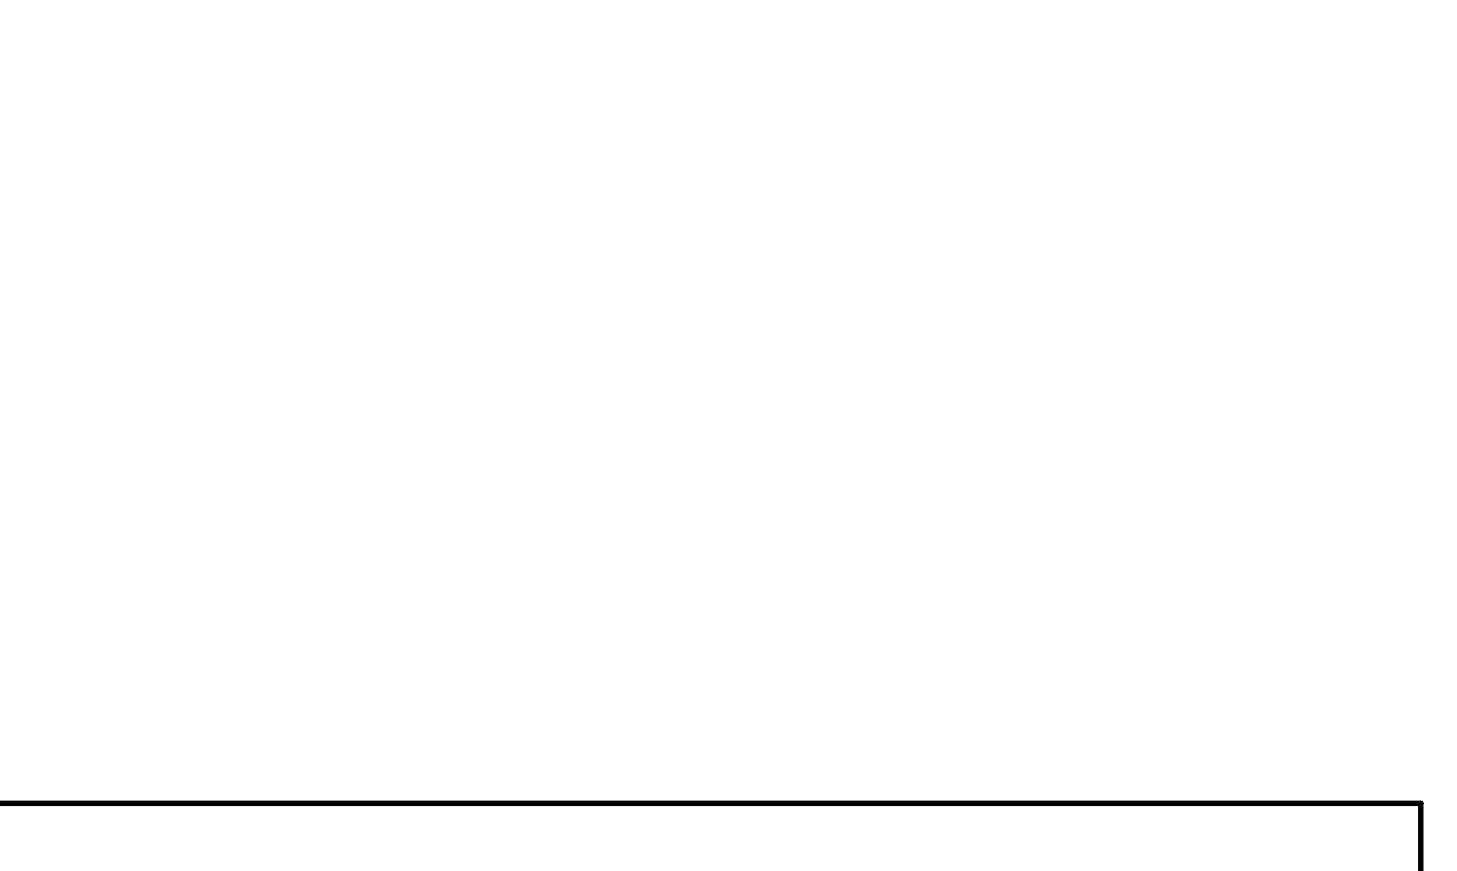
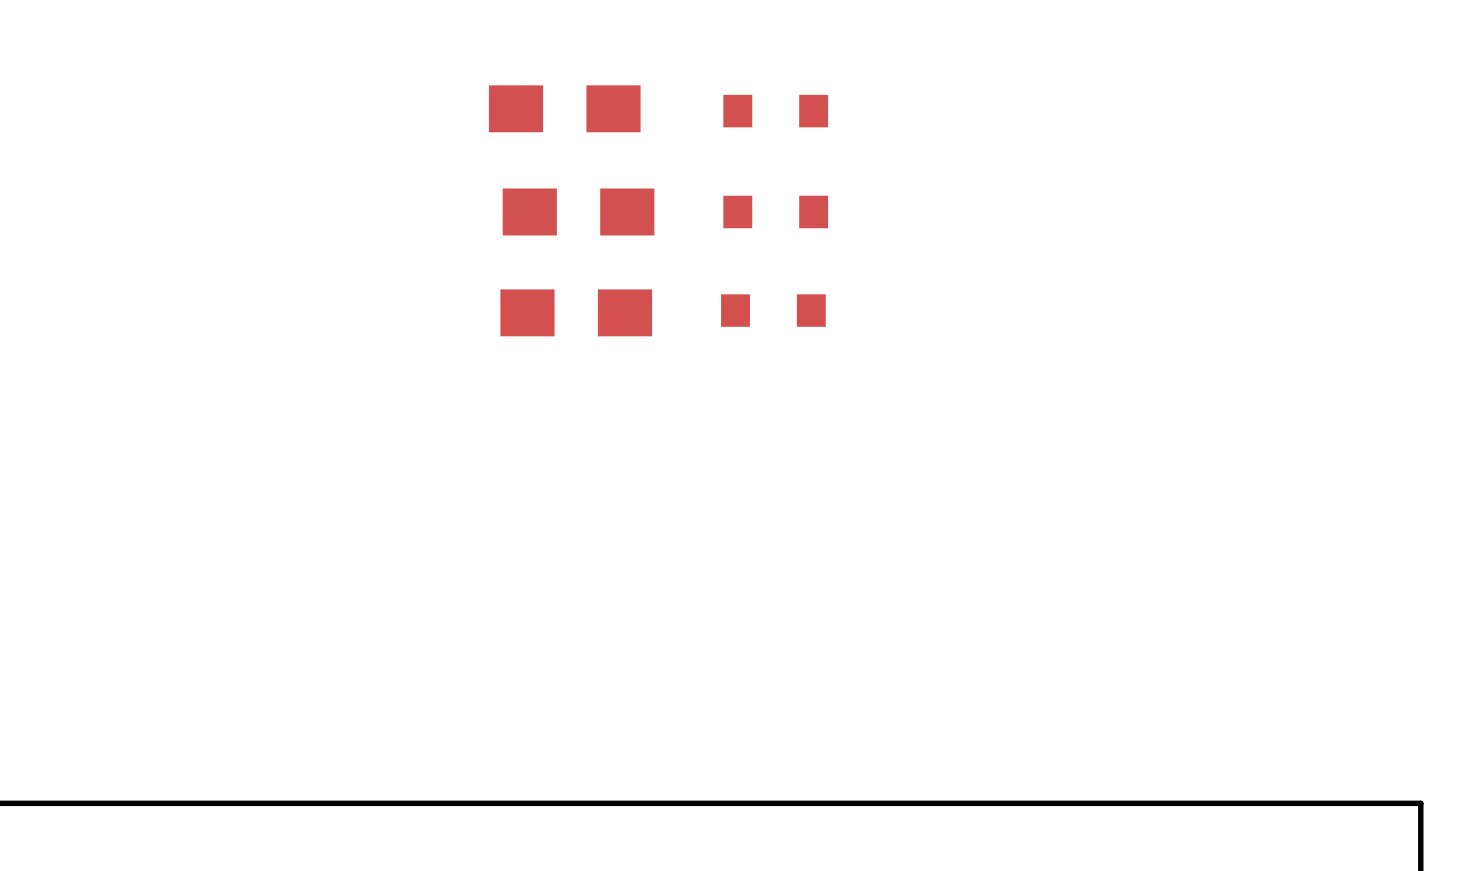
part: none -> (564, 108)
part: none -> (775, 111)
part: none -> (578, 211)
part: none -> (775, 211)
part: none -> (773, 310)
part: none -> (576, 312)

